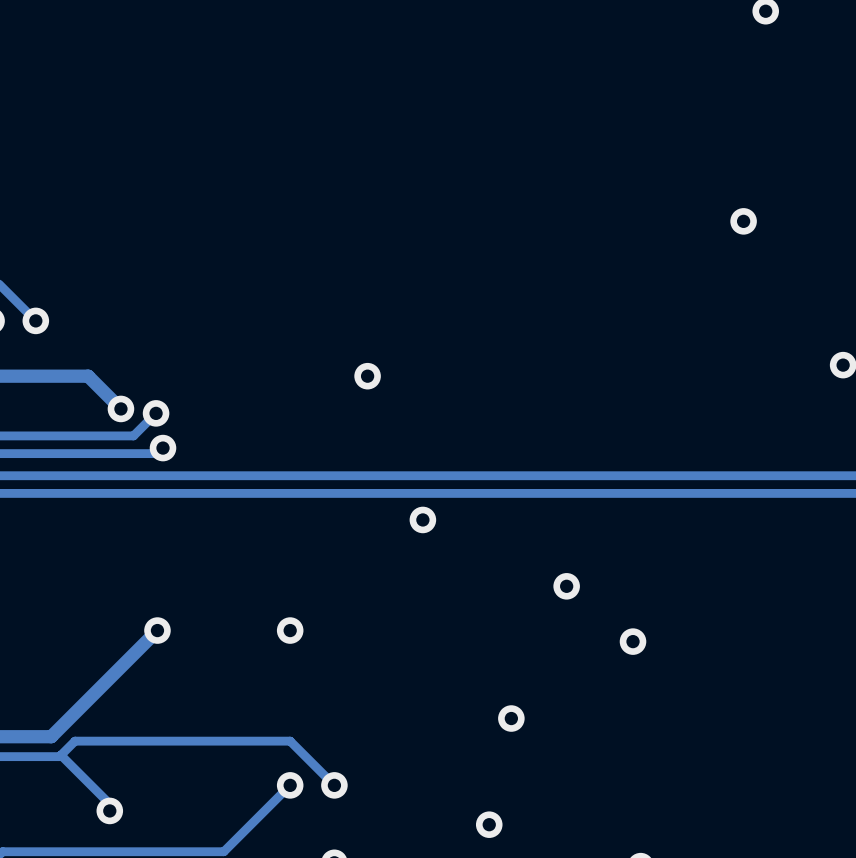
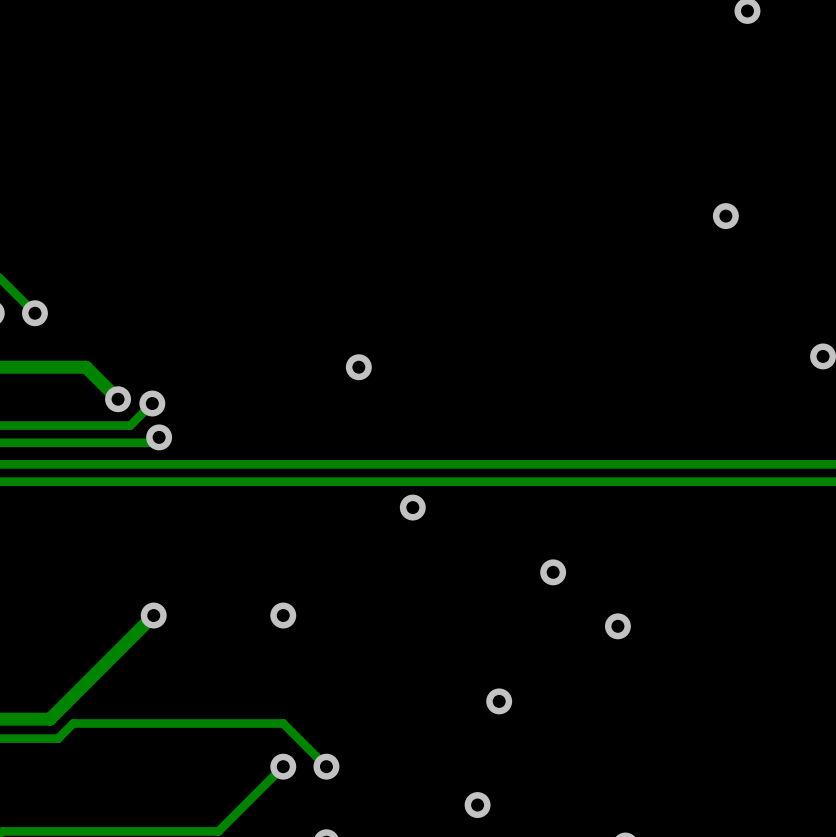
track: (60, 755) (109, 804) (109, 810) -> none
via: (109, 810) -> none

